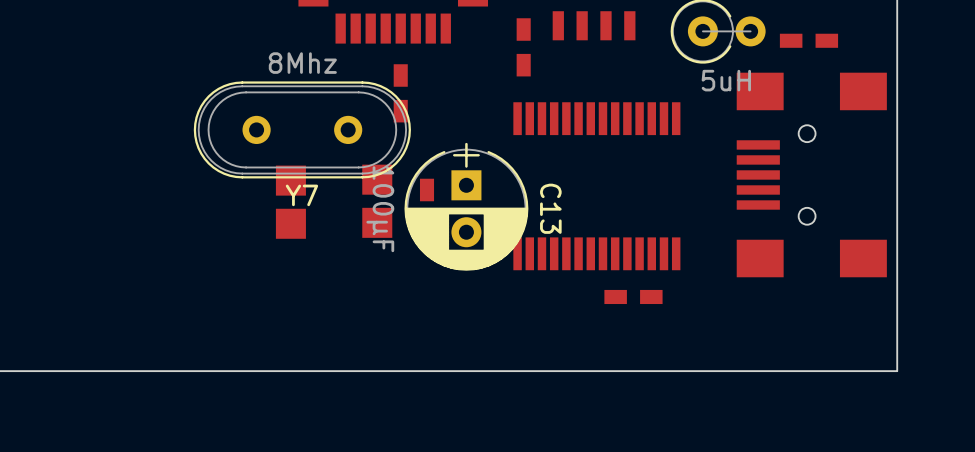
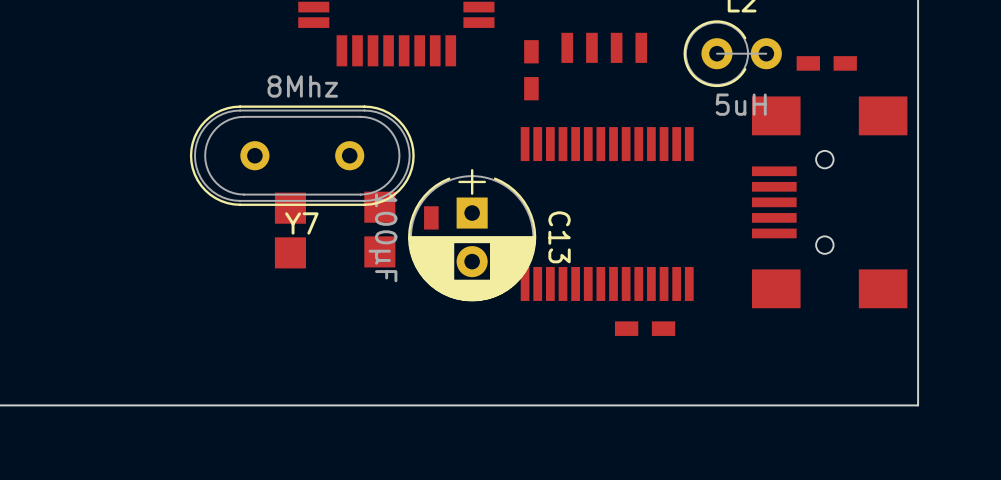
part: (400, 93) -> none

